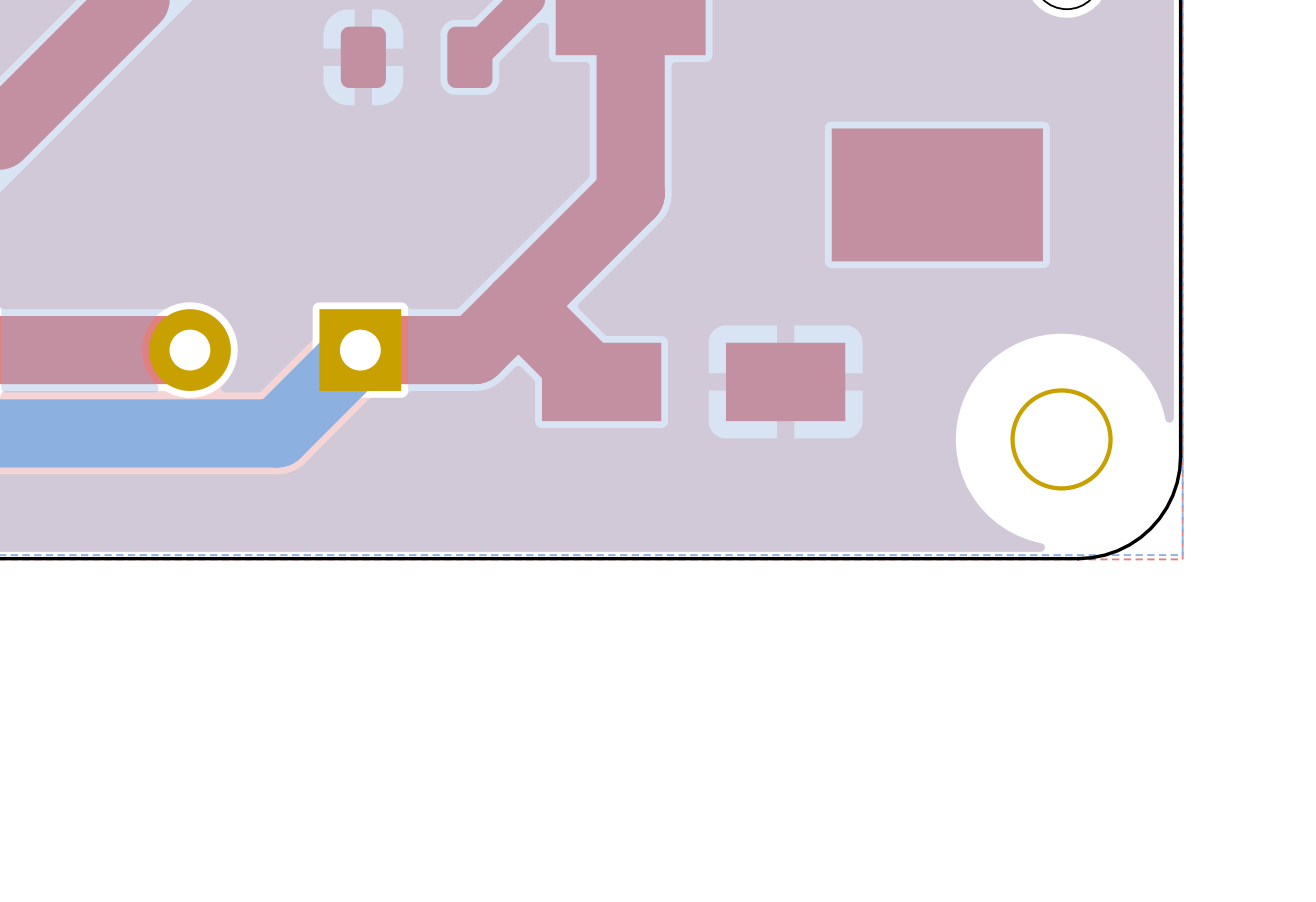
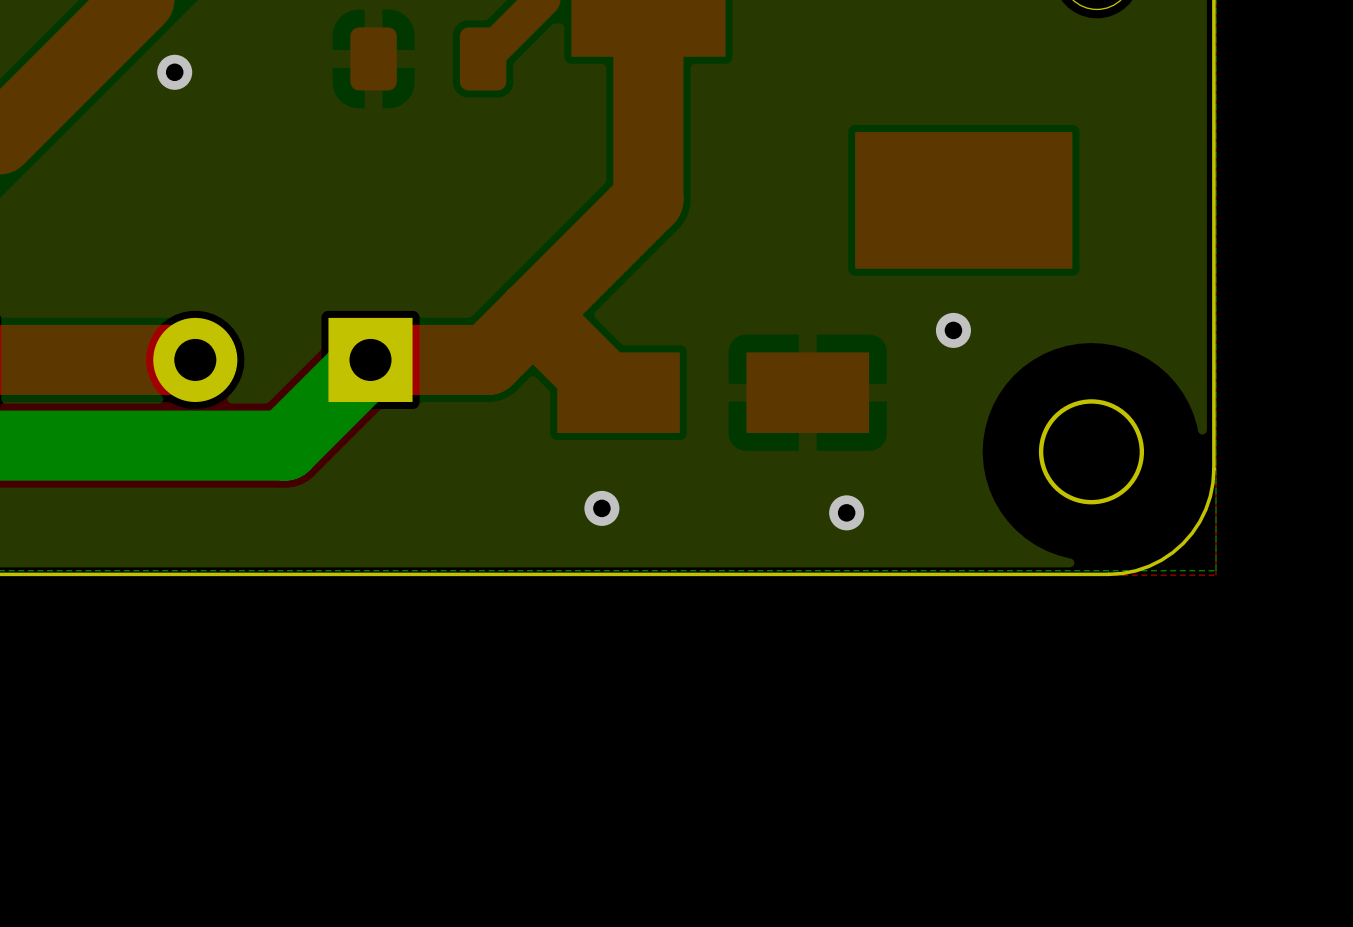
via: none -> (174, 72)
via: none -> (953, 330)
via: none -> (601, 508)
via: none -> (846, 512)

